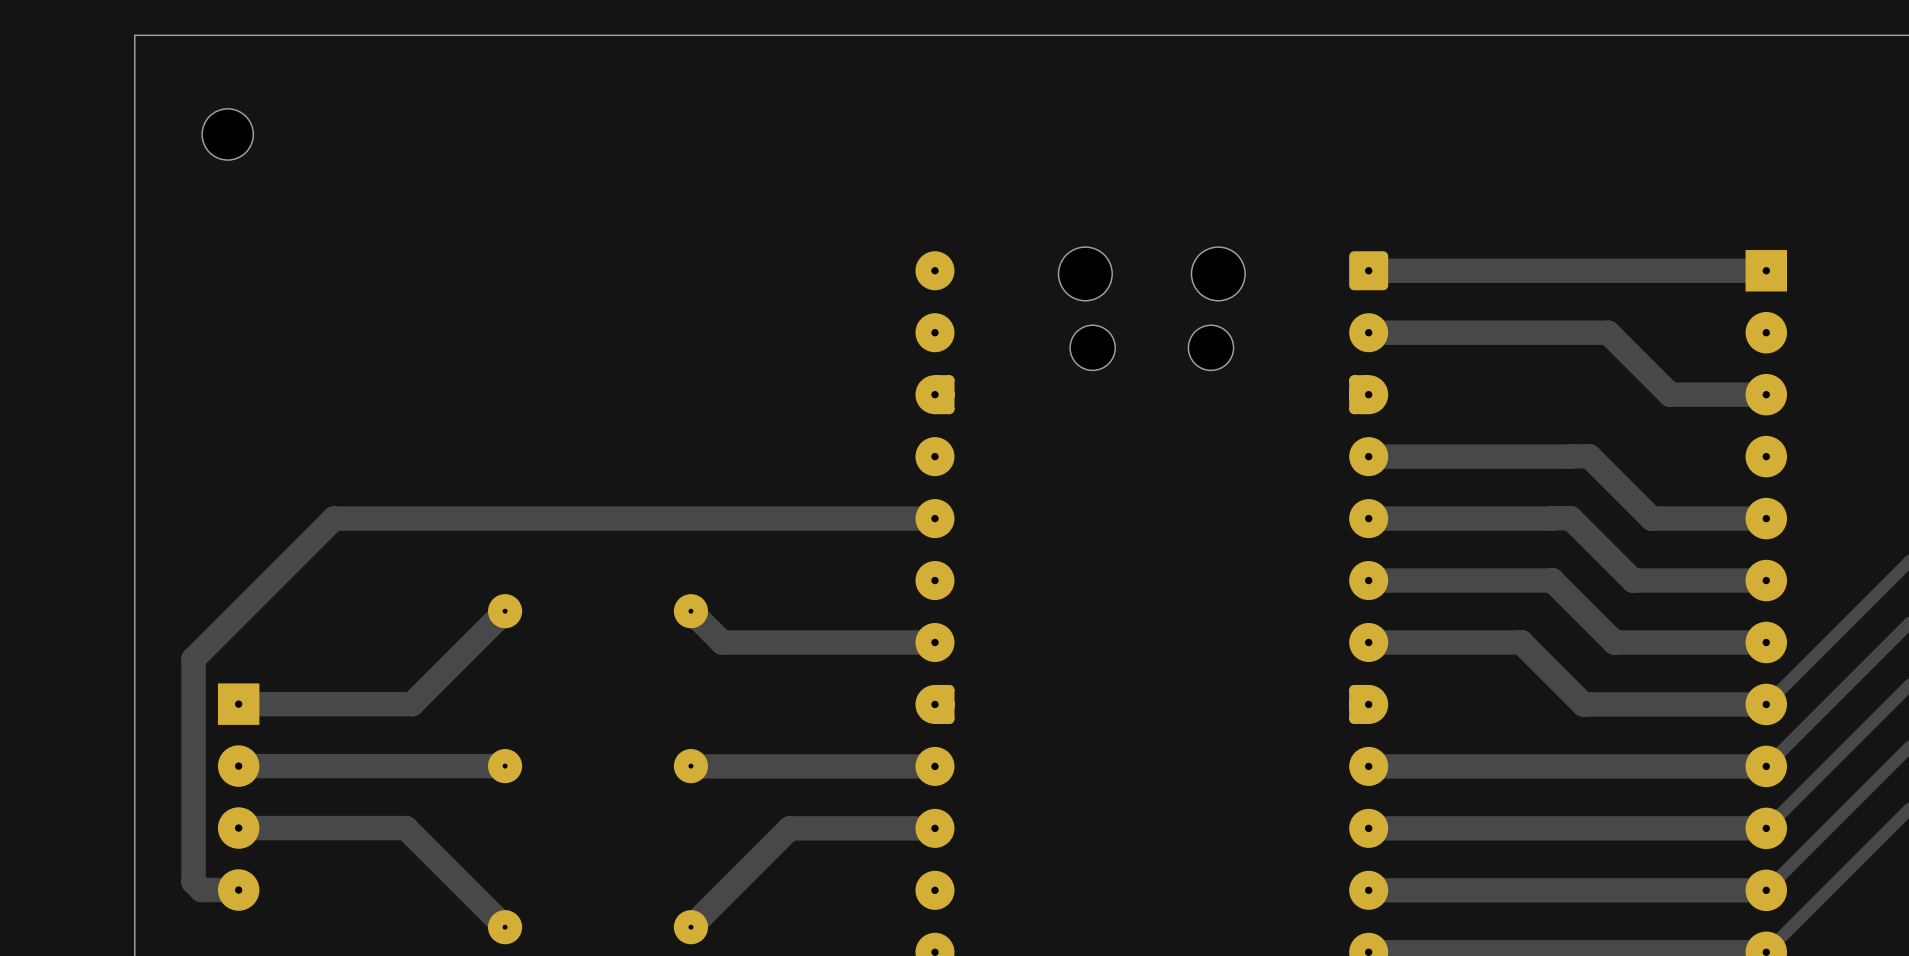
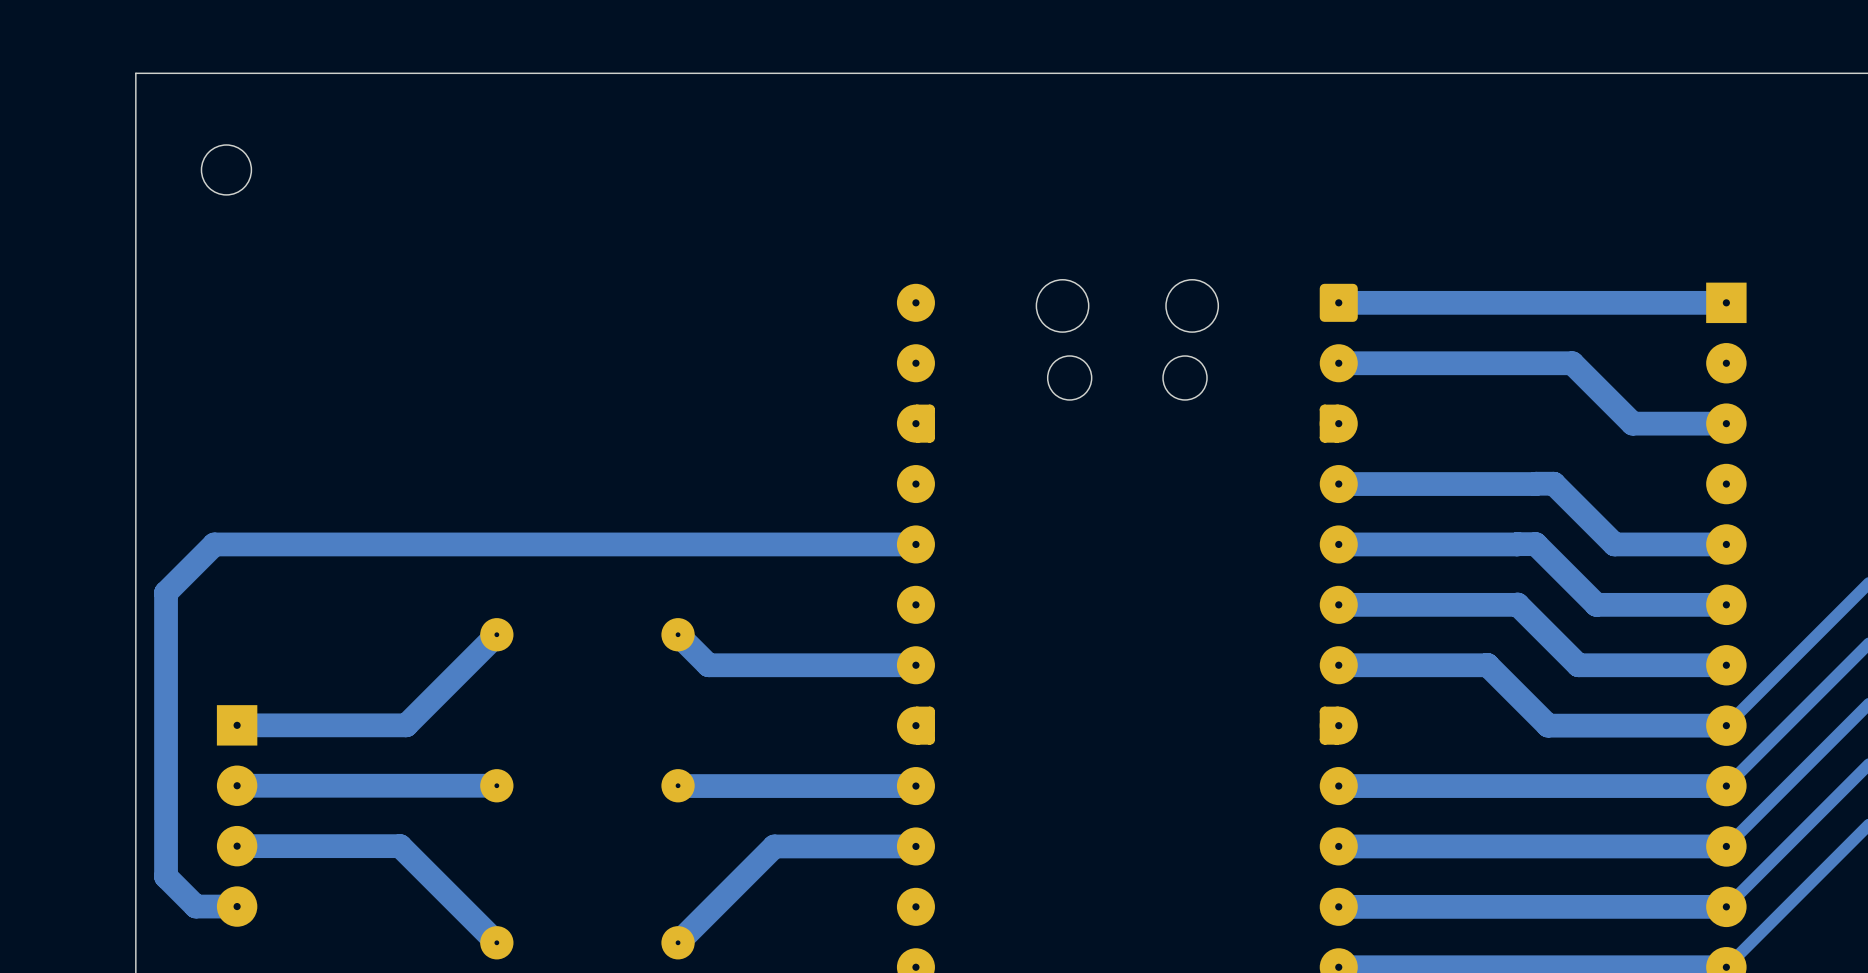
track: (333, 518) (193, 659) (193, 882) (201, 890) -> (330, 544) (214, 544) (166, 592) (166, 876) (195, 906) (200, 906)

